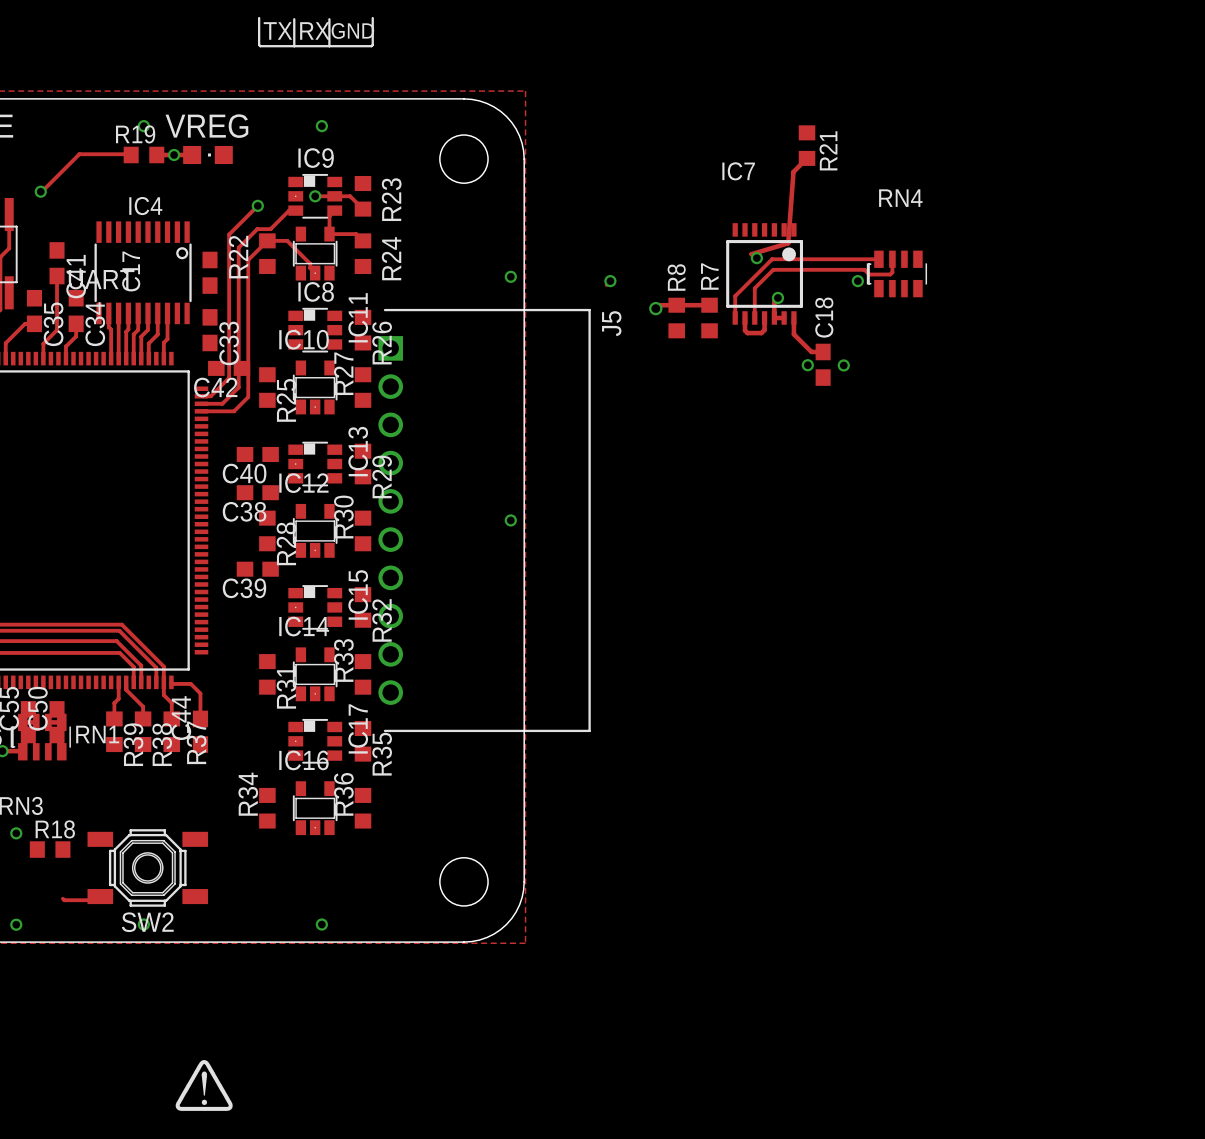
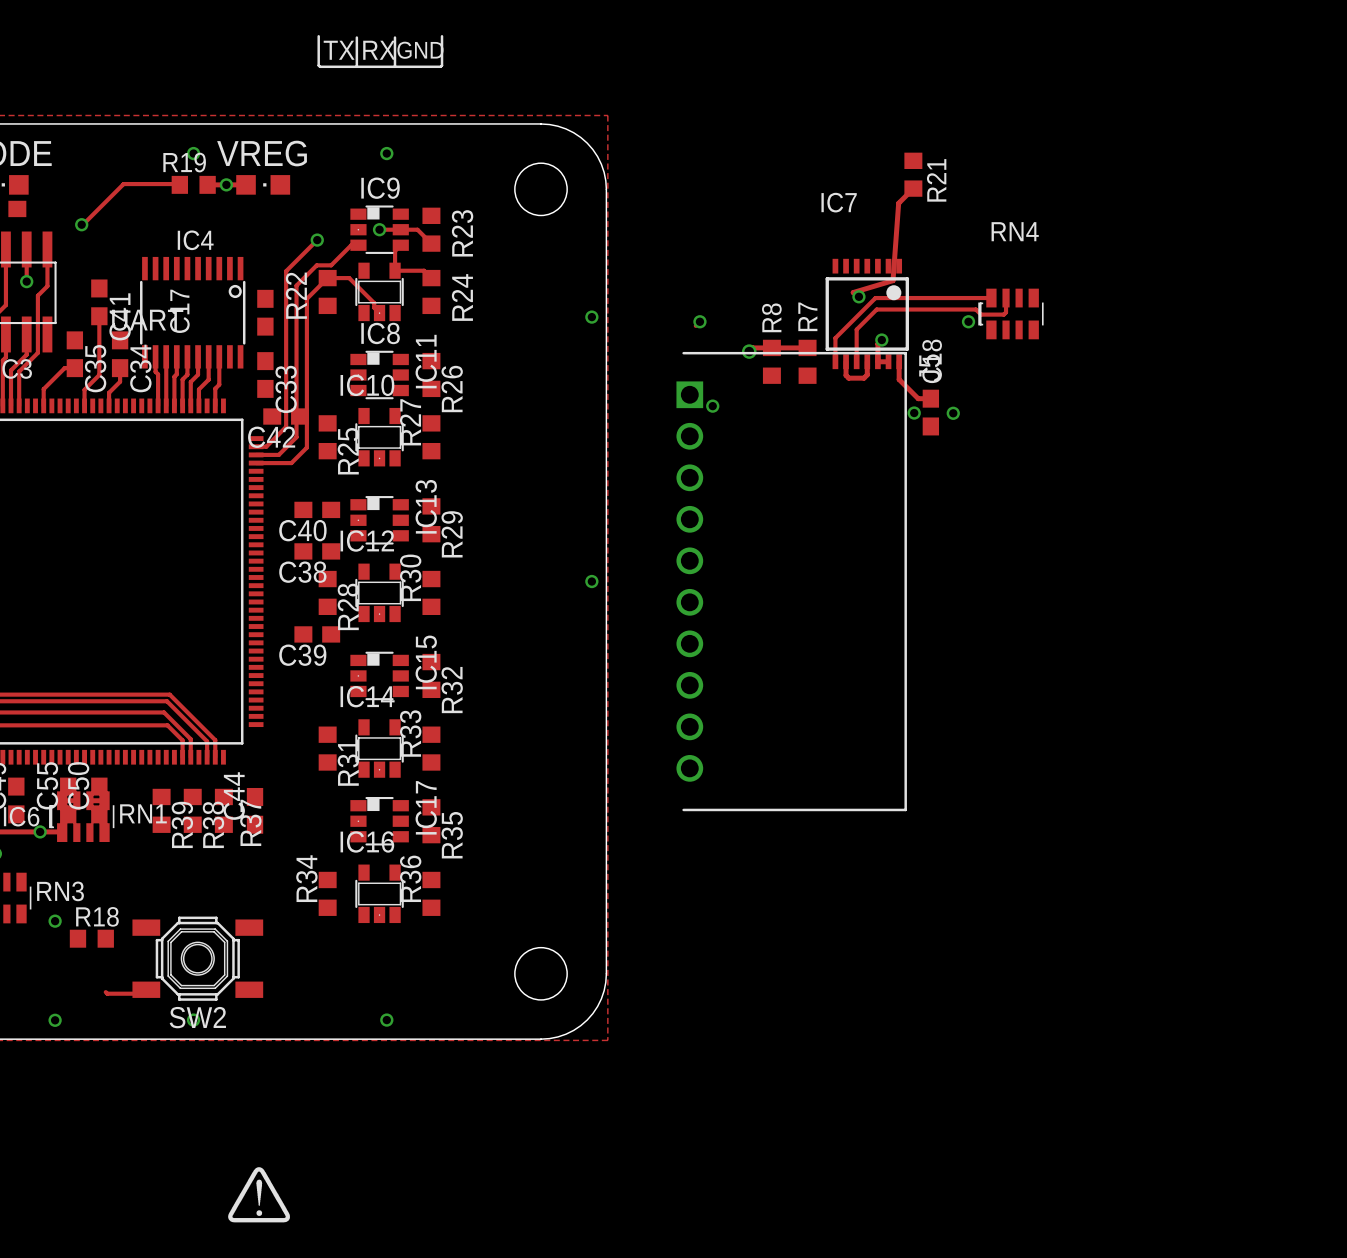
via: none -> (712, 406)
J5 position: (484, 520) -> (791, 581)
track: (118, 682) (118, 698) (114, 703) (114, 718) -> none
track: (126, 682) (126, 689) (143, 706) (143, 718) -> none
track: (163, 682) (163, 695) (171, 703) (171, 718) -> none
track: (171, 682) (190, 683) (200, 693) (200, 718) -> none

